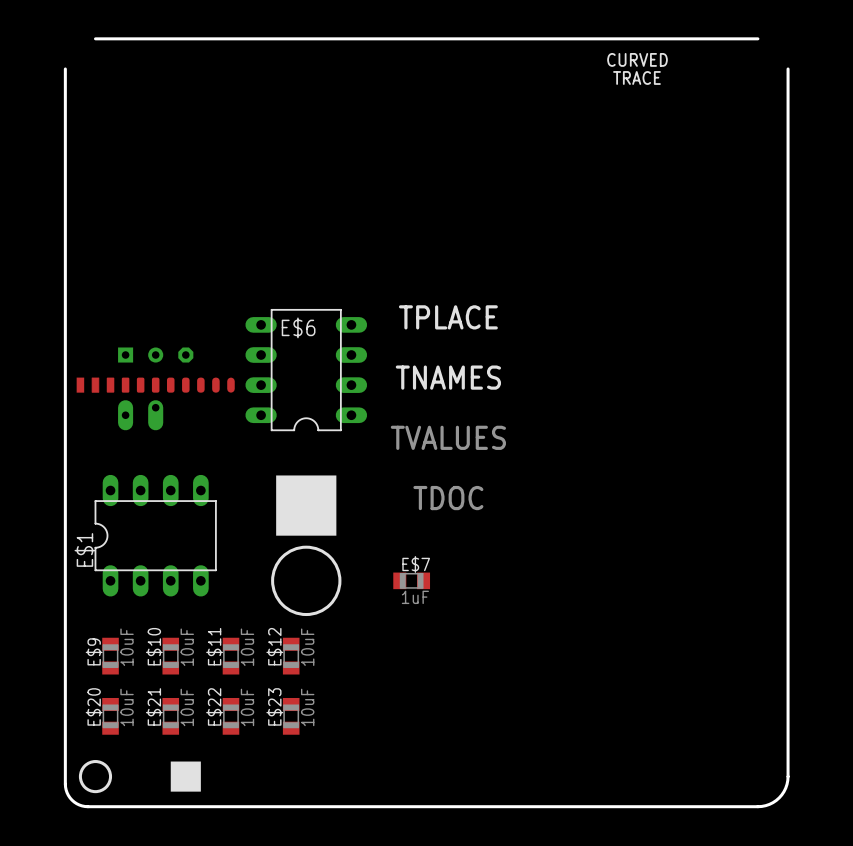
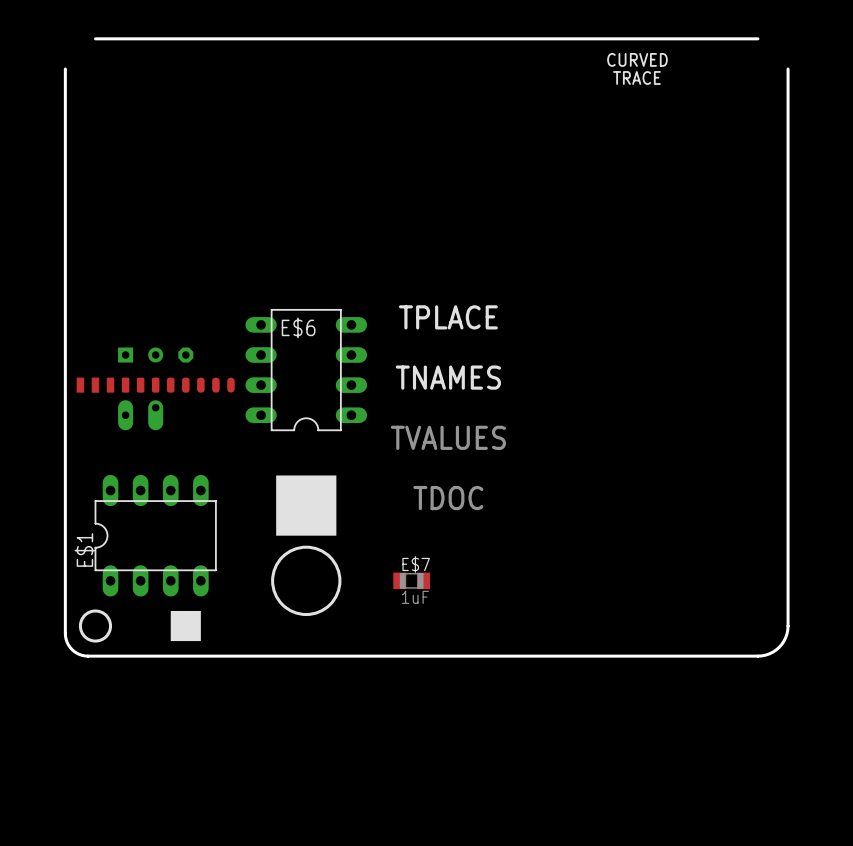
board edge: (788, 626) (787, 780) (785, 788) (779, 797) (769, 804) (757, 806) (82, 805) (70, 797) (65, 787) (65, 633) -> (788, 626) (785, 637) (779, 647) (769, 653) (757, 656) (87, 656) (79, 654) (71, 649) (67, 642) (65, 633)
E$9: 10uF (110, 656) -> none
E$10: 10uF (170, 656) -> none
E$11: 10uF (230, 656) -> none
E$12: 10uF (291, 656) -> none
E$20: 10uF (110, 716) -> none
E$21: 10uF (170, 716) -> none
E$22: 10uF (230, 716) -> none
E$23: 10uF (291, 716) -> none
drawing position: (95, 776) -> (95, 626)
drawing position: (185, 776) -> (185, 626)

